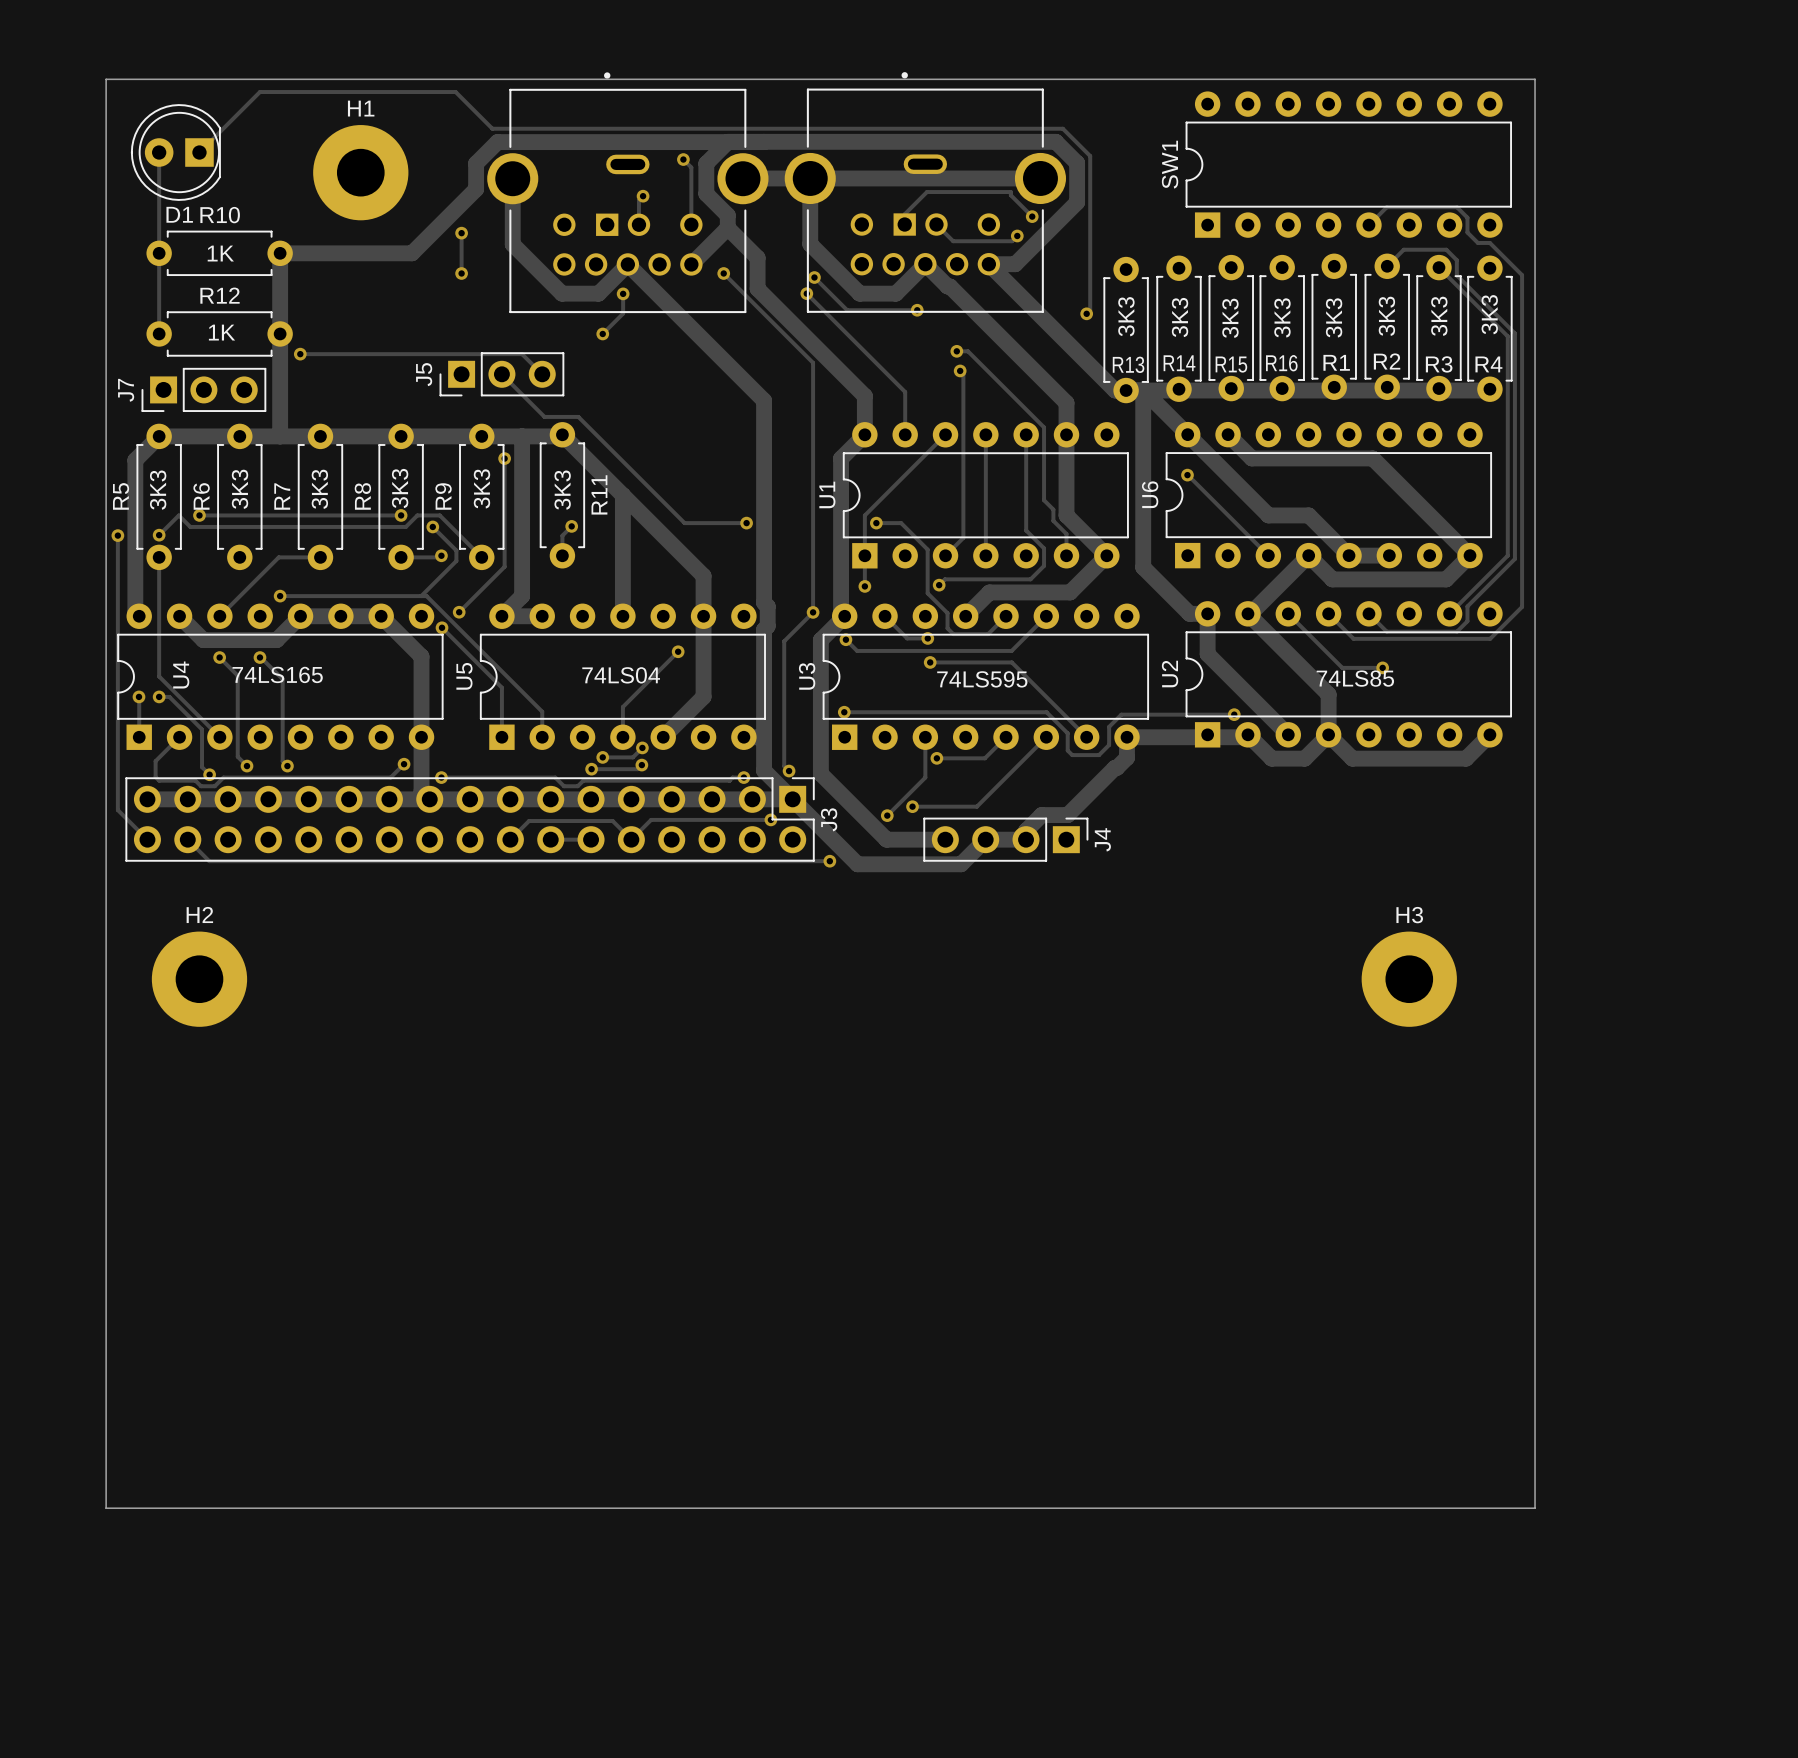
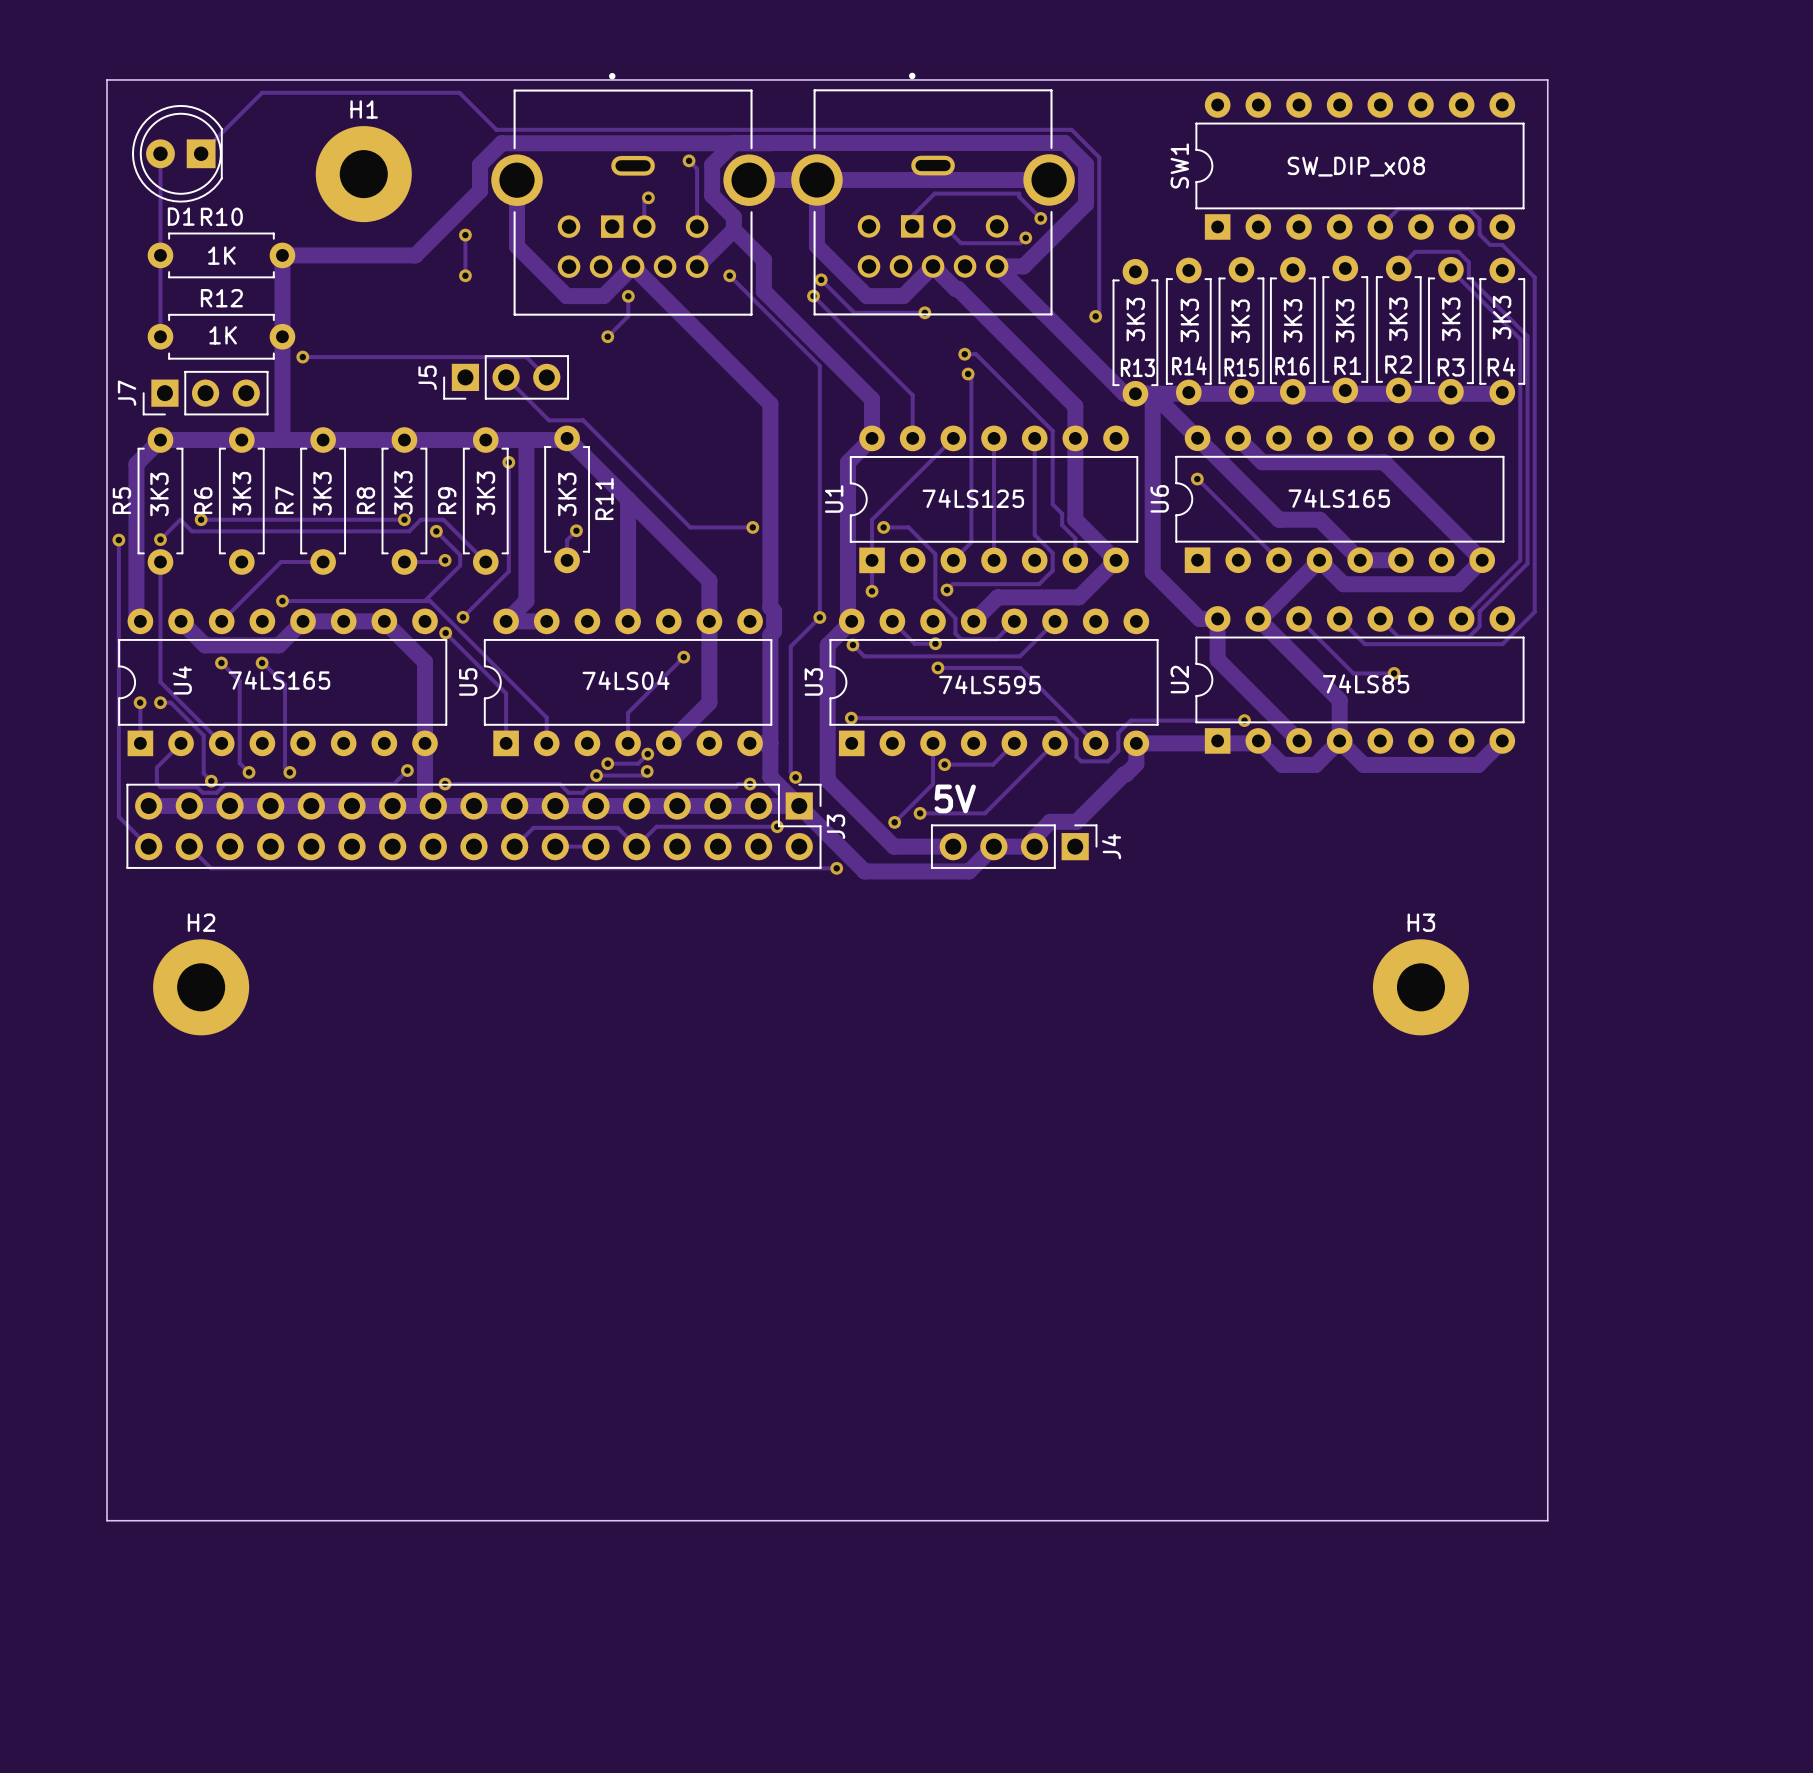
SW1 value: none -> SW_DIP_x08 (1356, 166)
U1 value: none -> 74LS125 (973, 498)
U6 value: none -> 74LS165 (1339, 498)
text: none -> 5V (955, 798)

